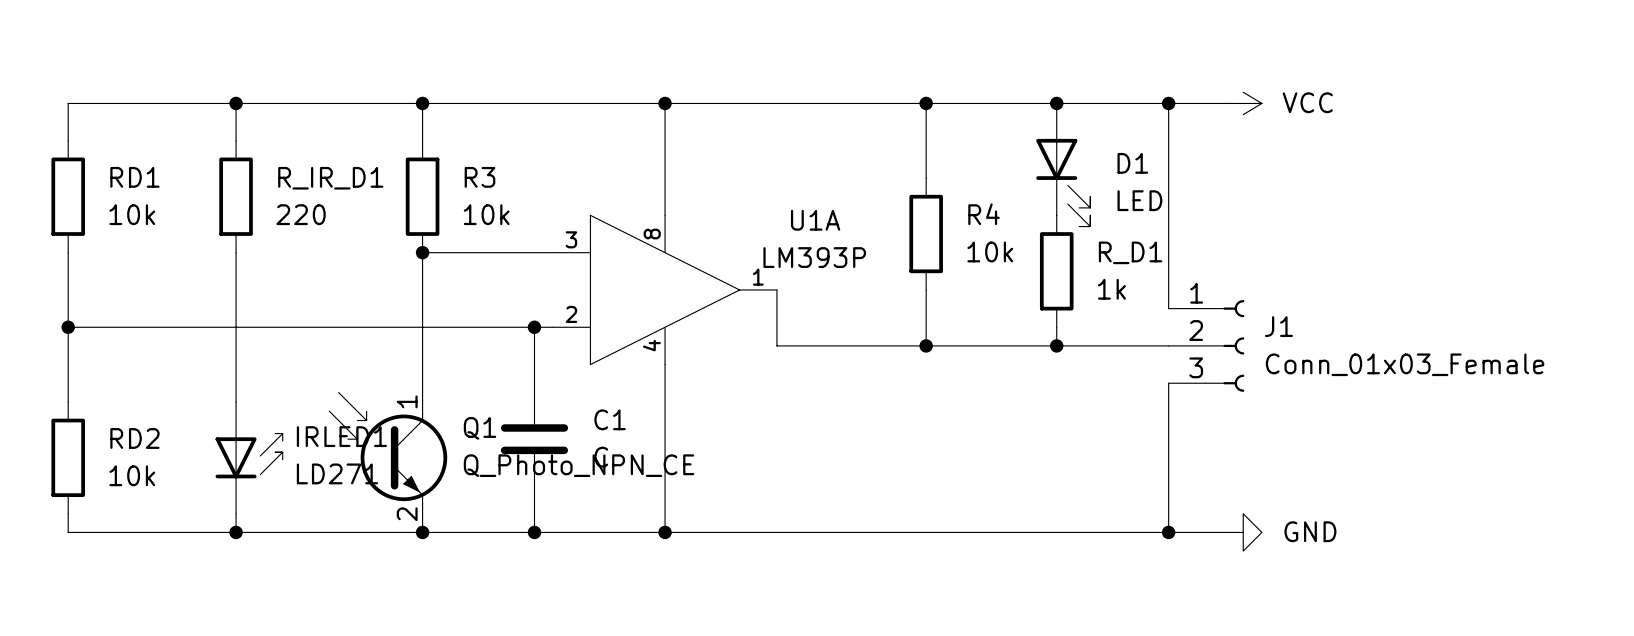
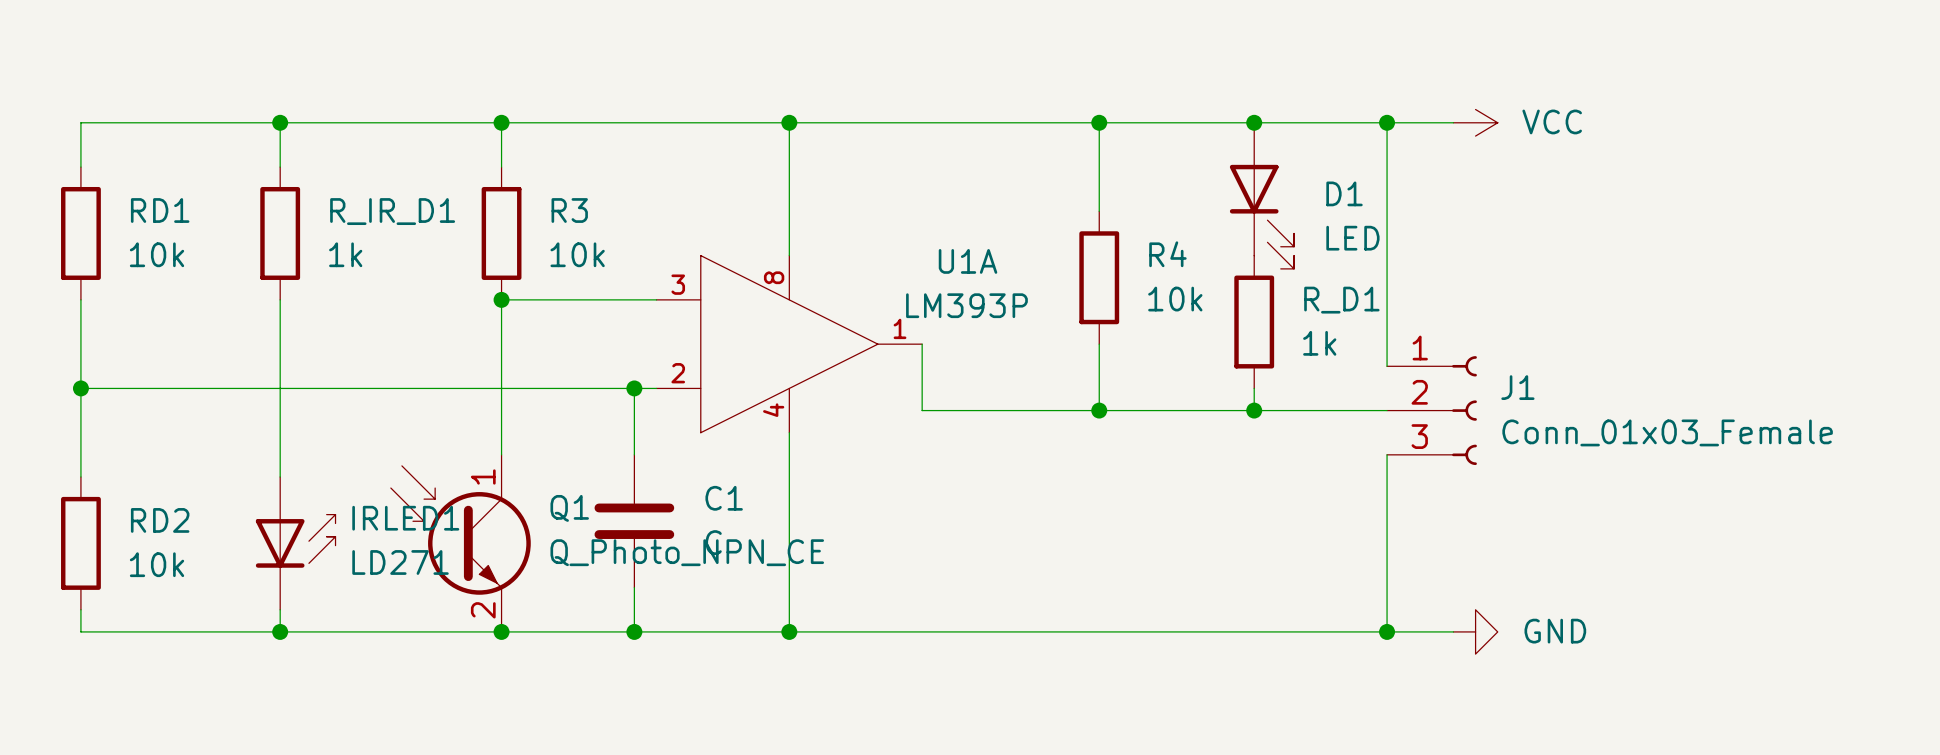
R_IR_D1 value: 220 (301, 214) -> 1k (345, 254)

